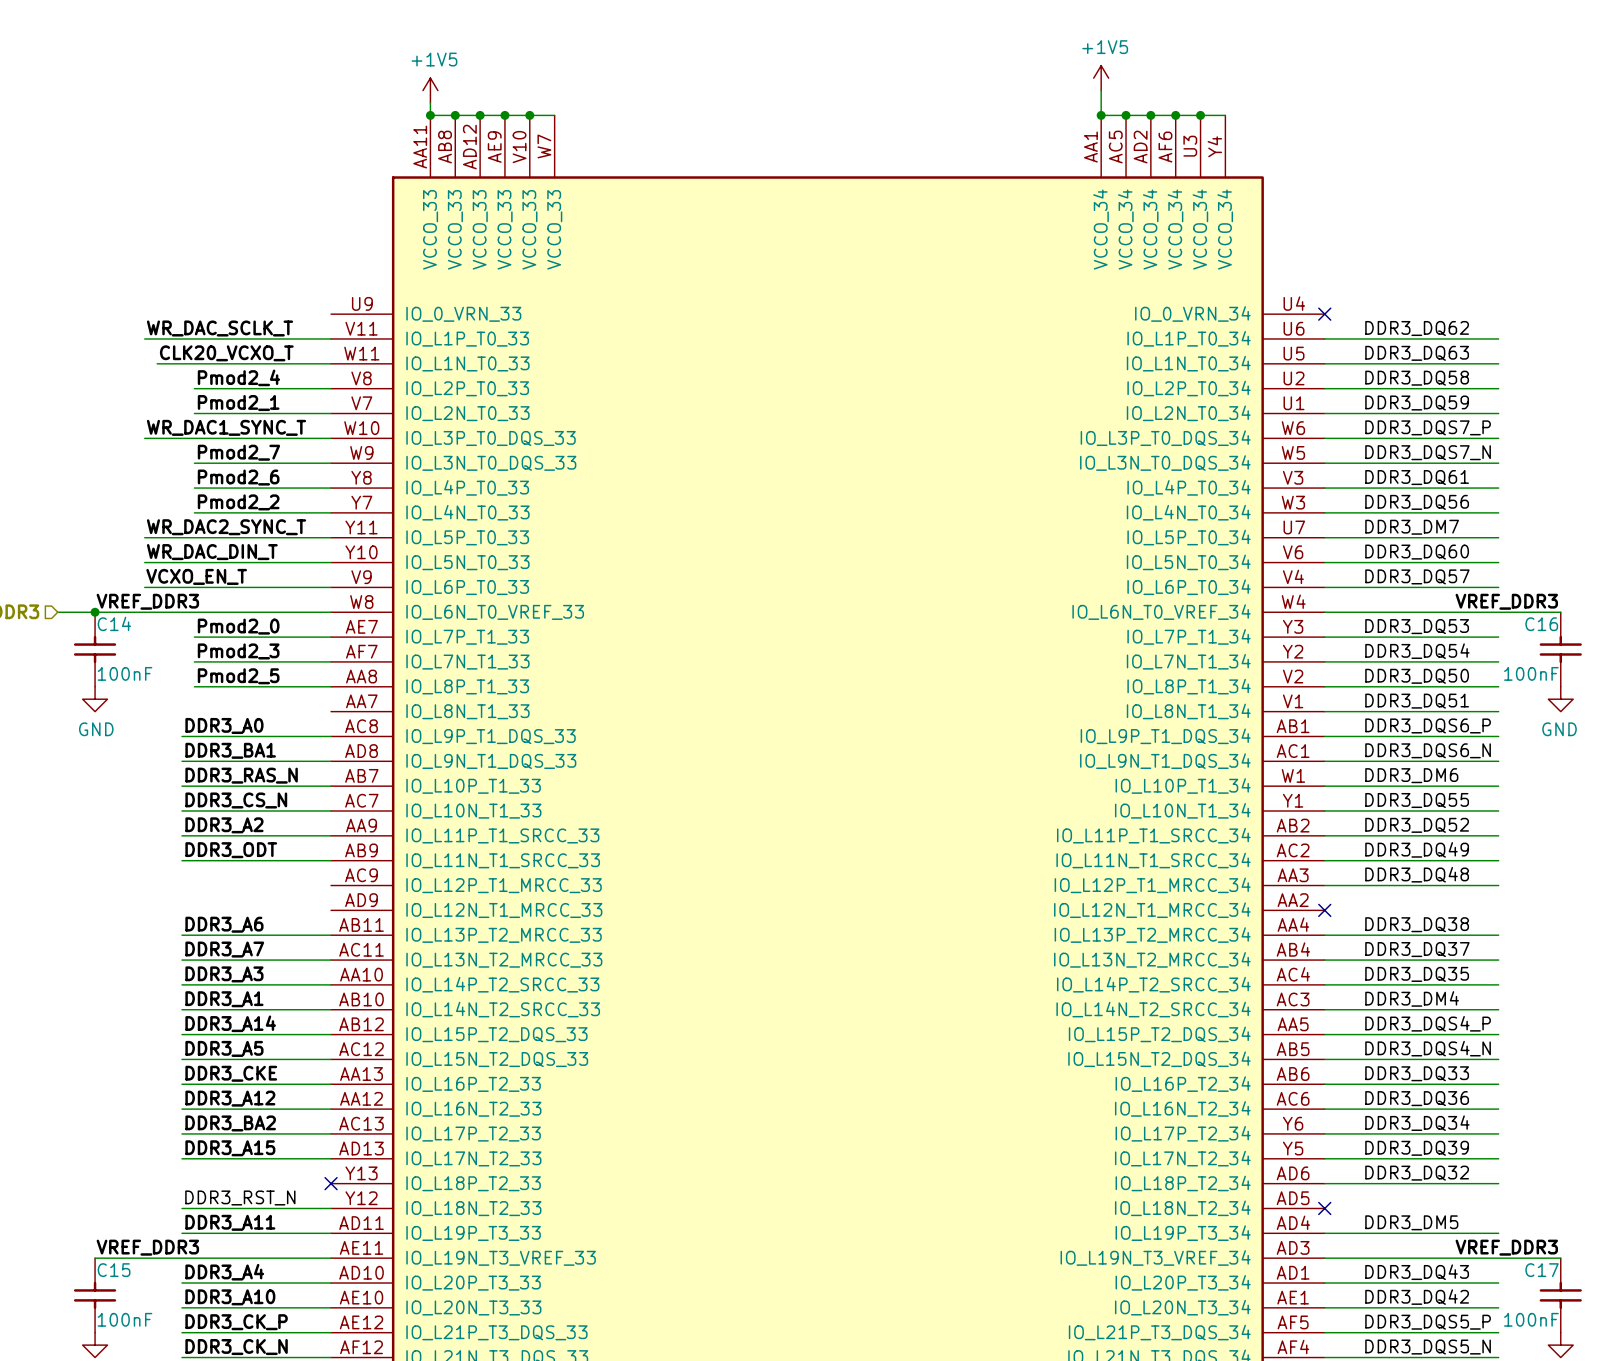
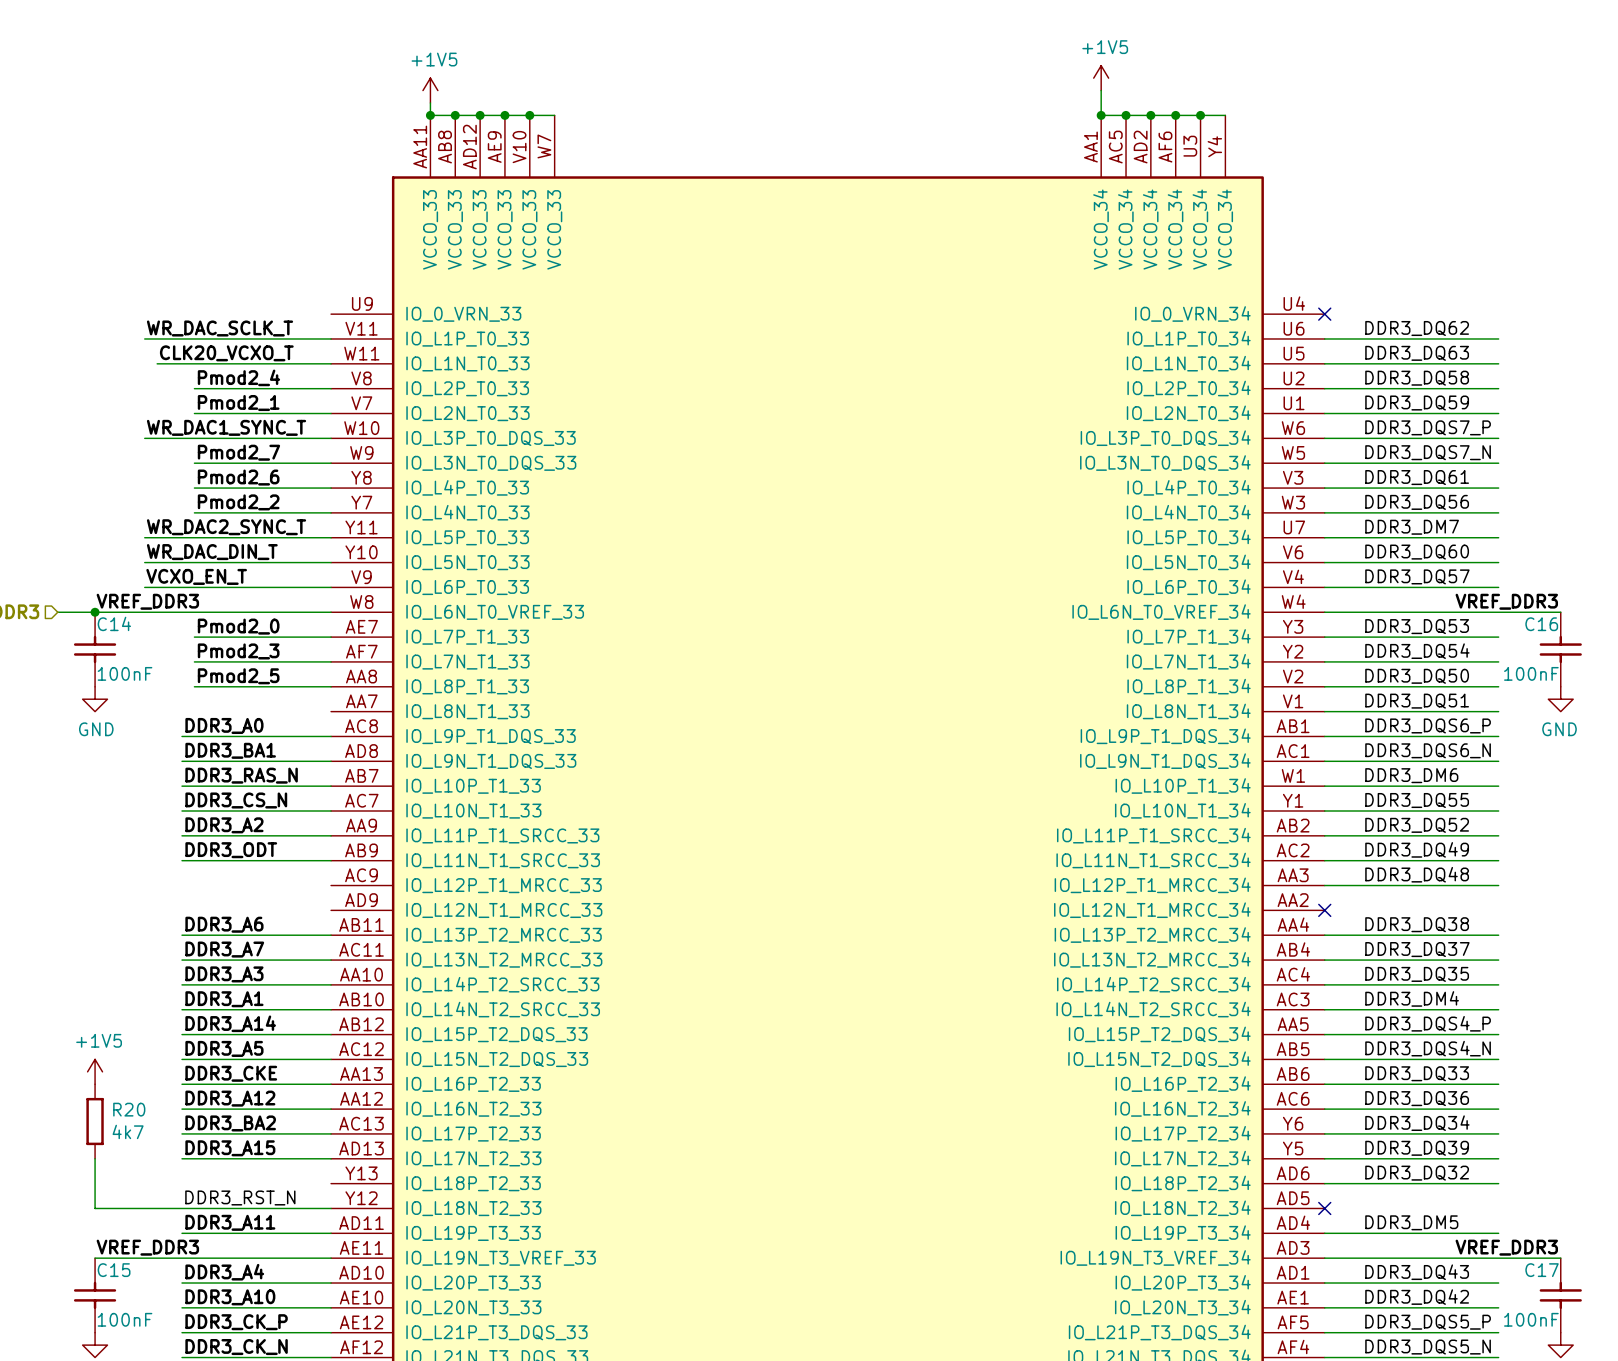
power symbol: none -> +1V5 (95, 1071)
R20: none -> (95, 1121)
wire: none -> (95, 1158) (95, 1208) (182, 1208)
no-connect mark: (331, 1183) -> none

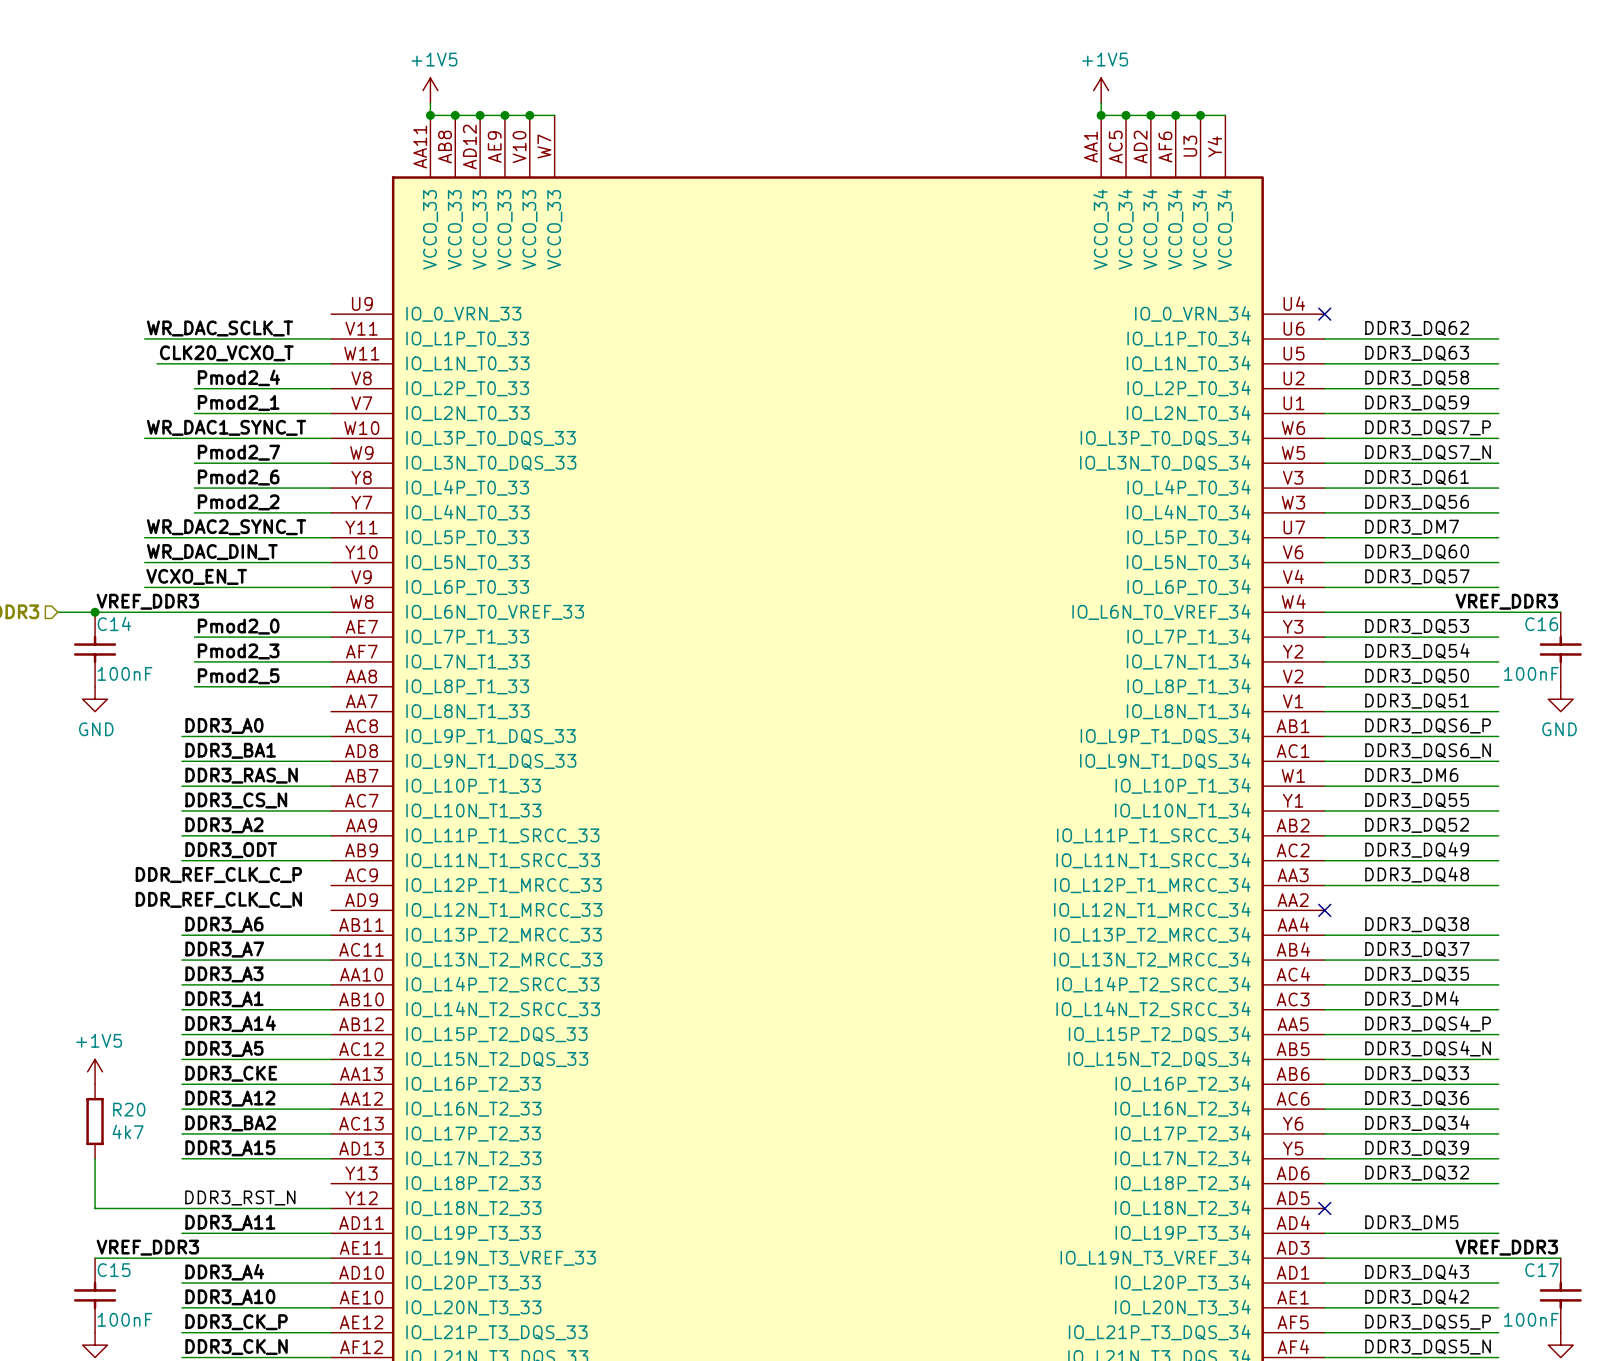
power symbol position: +1V5 (1101, 78) -> +1V5 (1101, 90)
label: none -> DDR_REF_CLK_C_P (218, 875)
label: none -> DDR_REF_CLK_C_N (218, 899)

